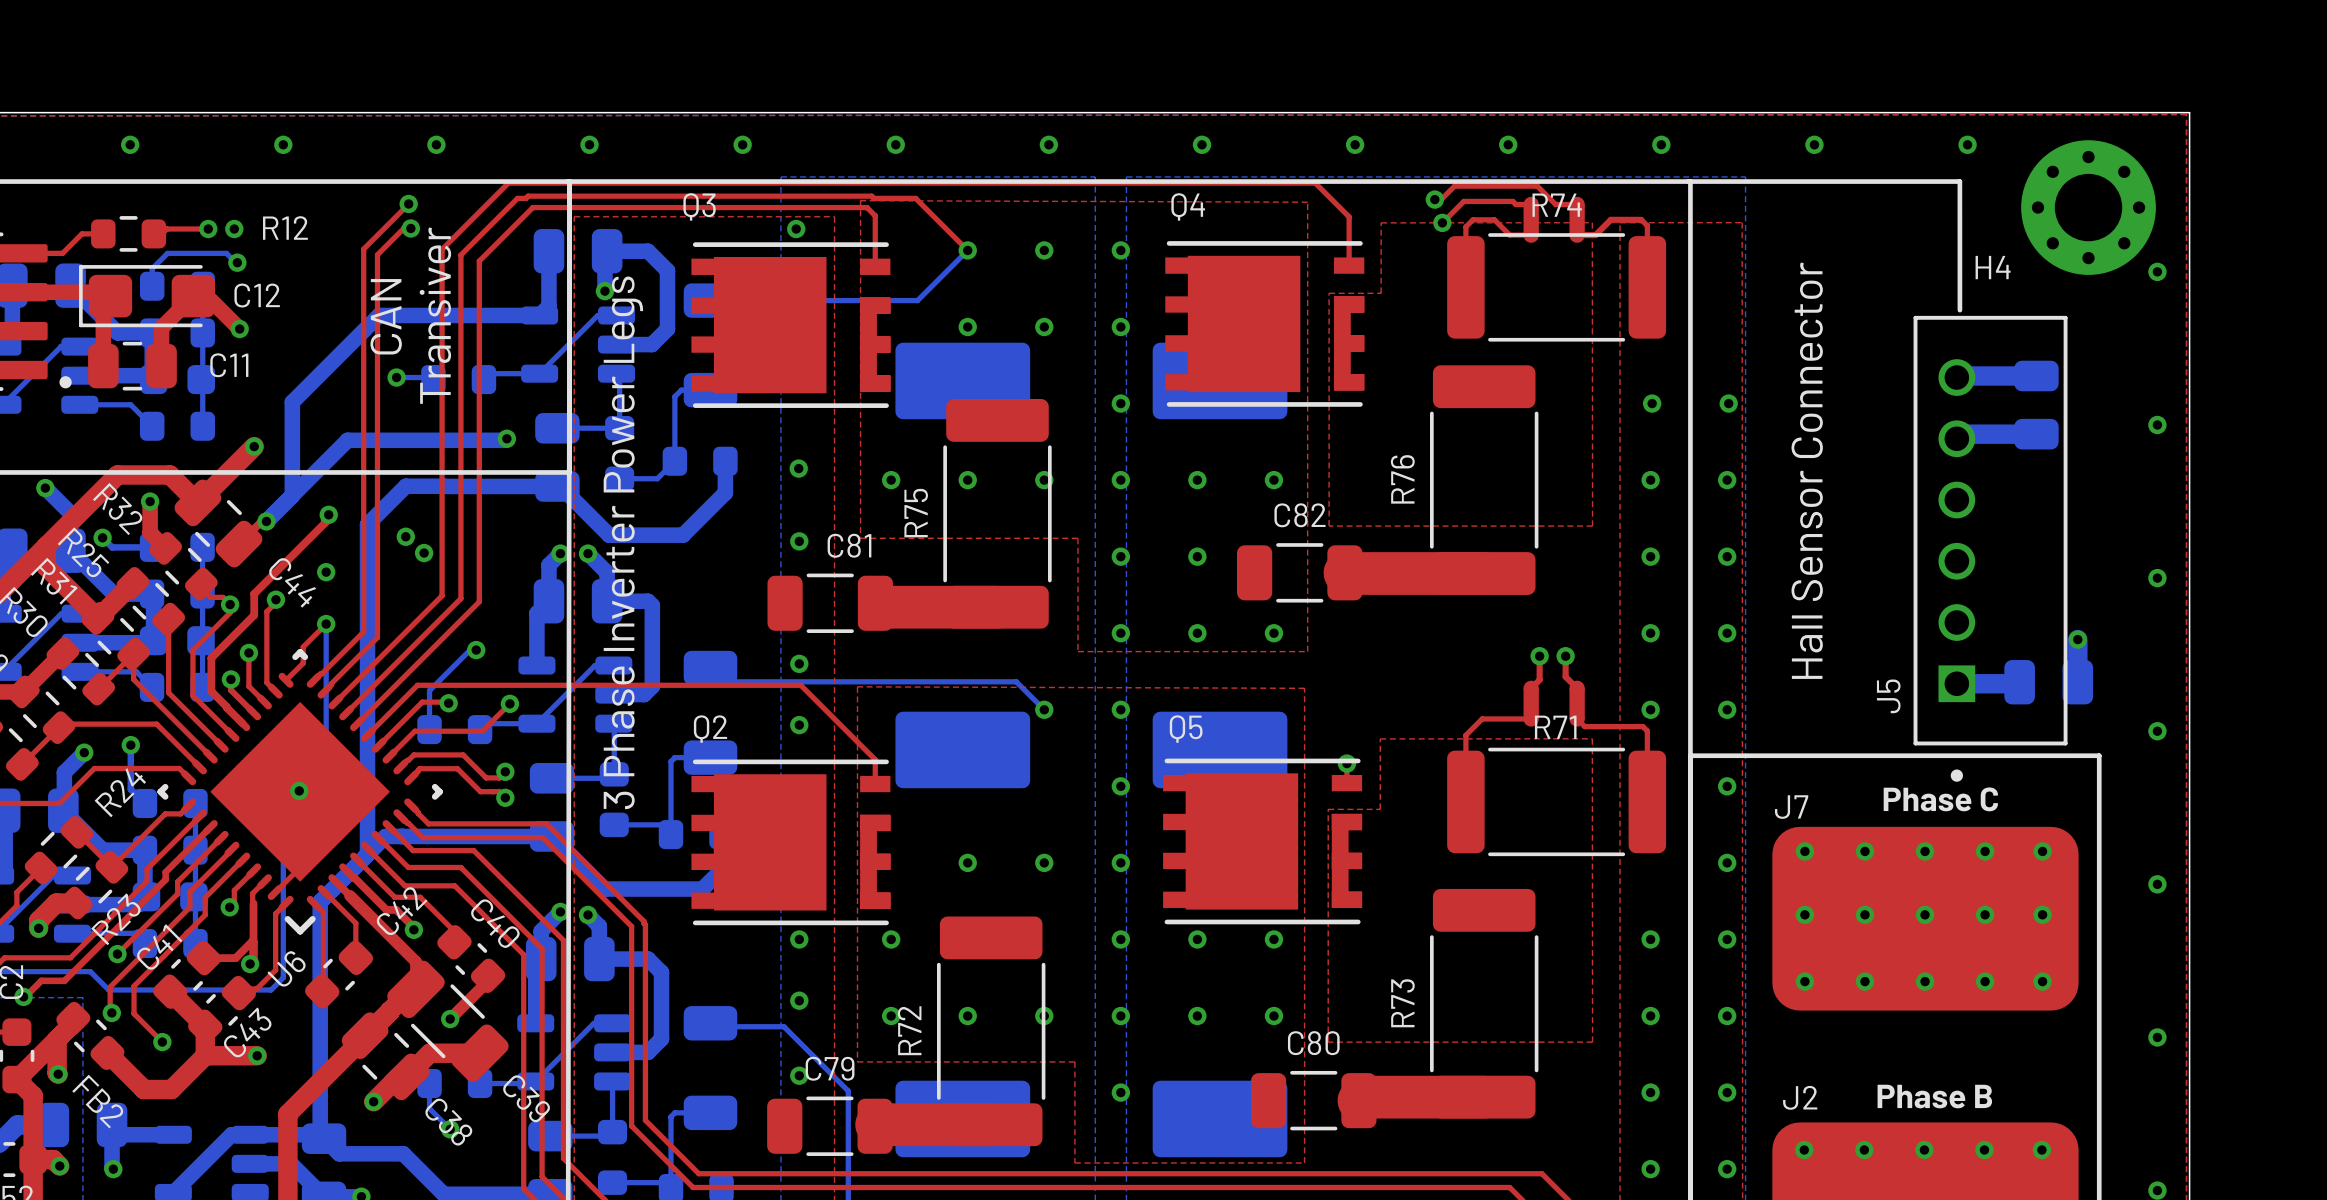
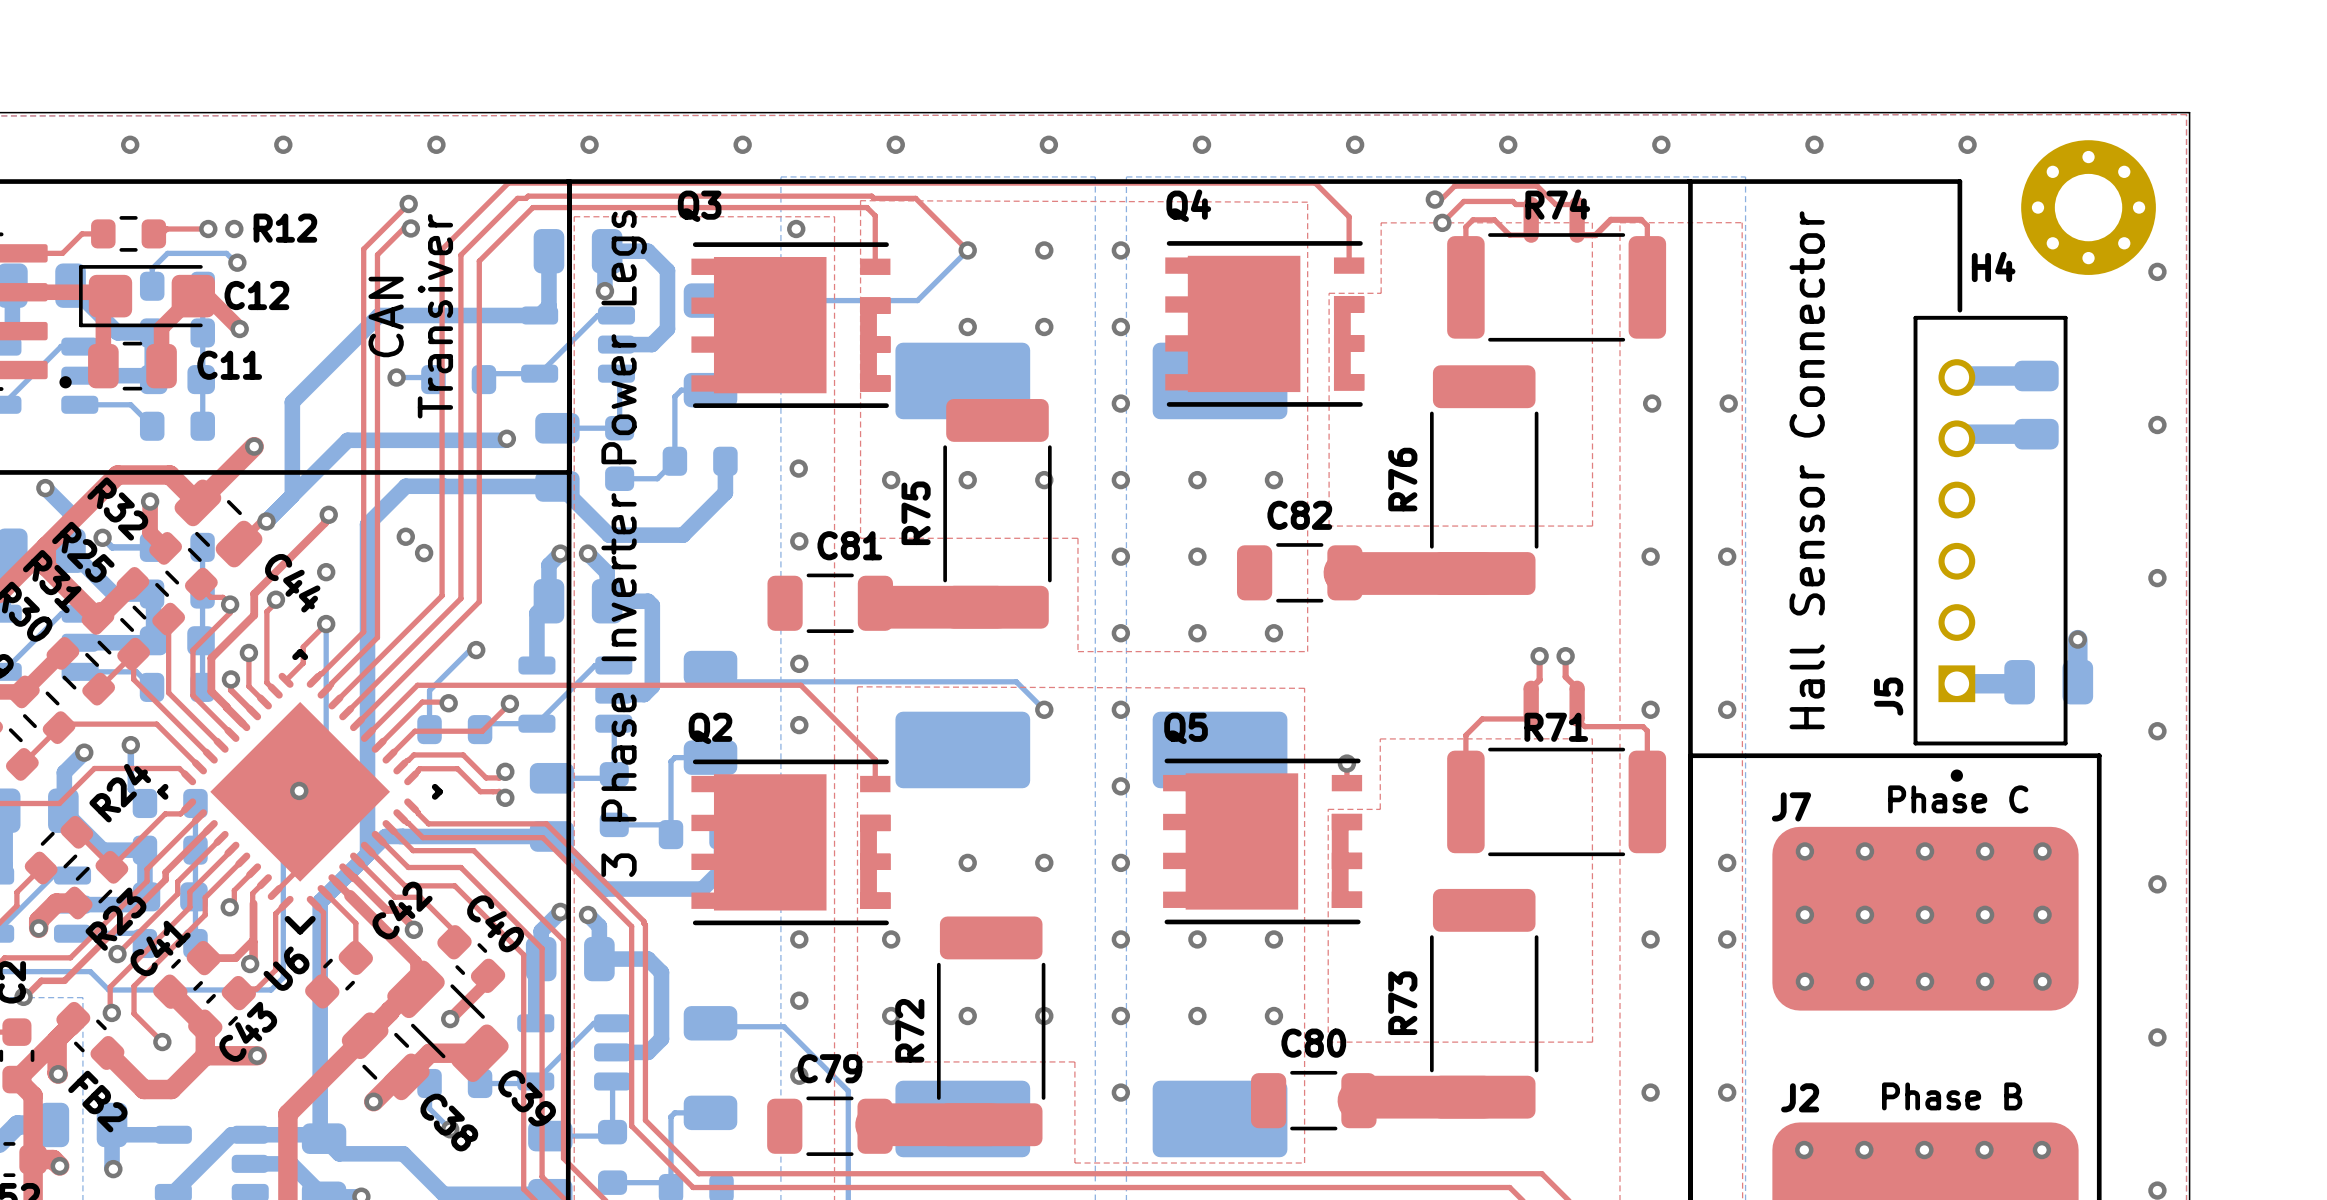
via: (1650, 480) -> none
via: (1727, 480) -> none
via: (1650, 633) -> none
via: (1727, 633) -> none
via: (1727, 786) -> none
via: (1650, 1016) -> none
via: (1727, 1016) -> none
via: (1650, 1169) -> none
via: (1727, 1169) -> none

